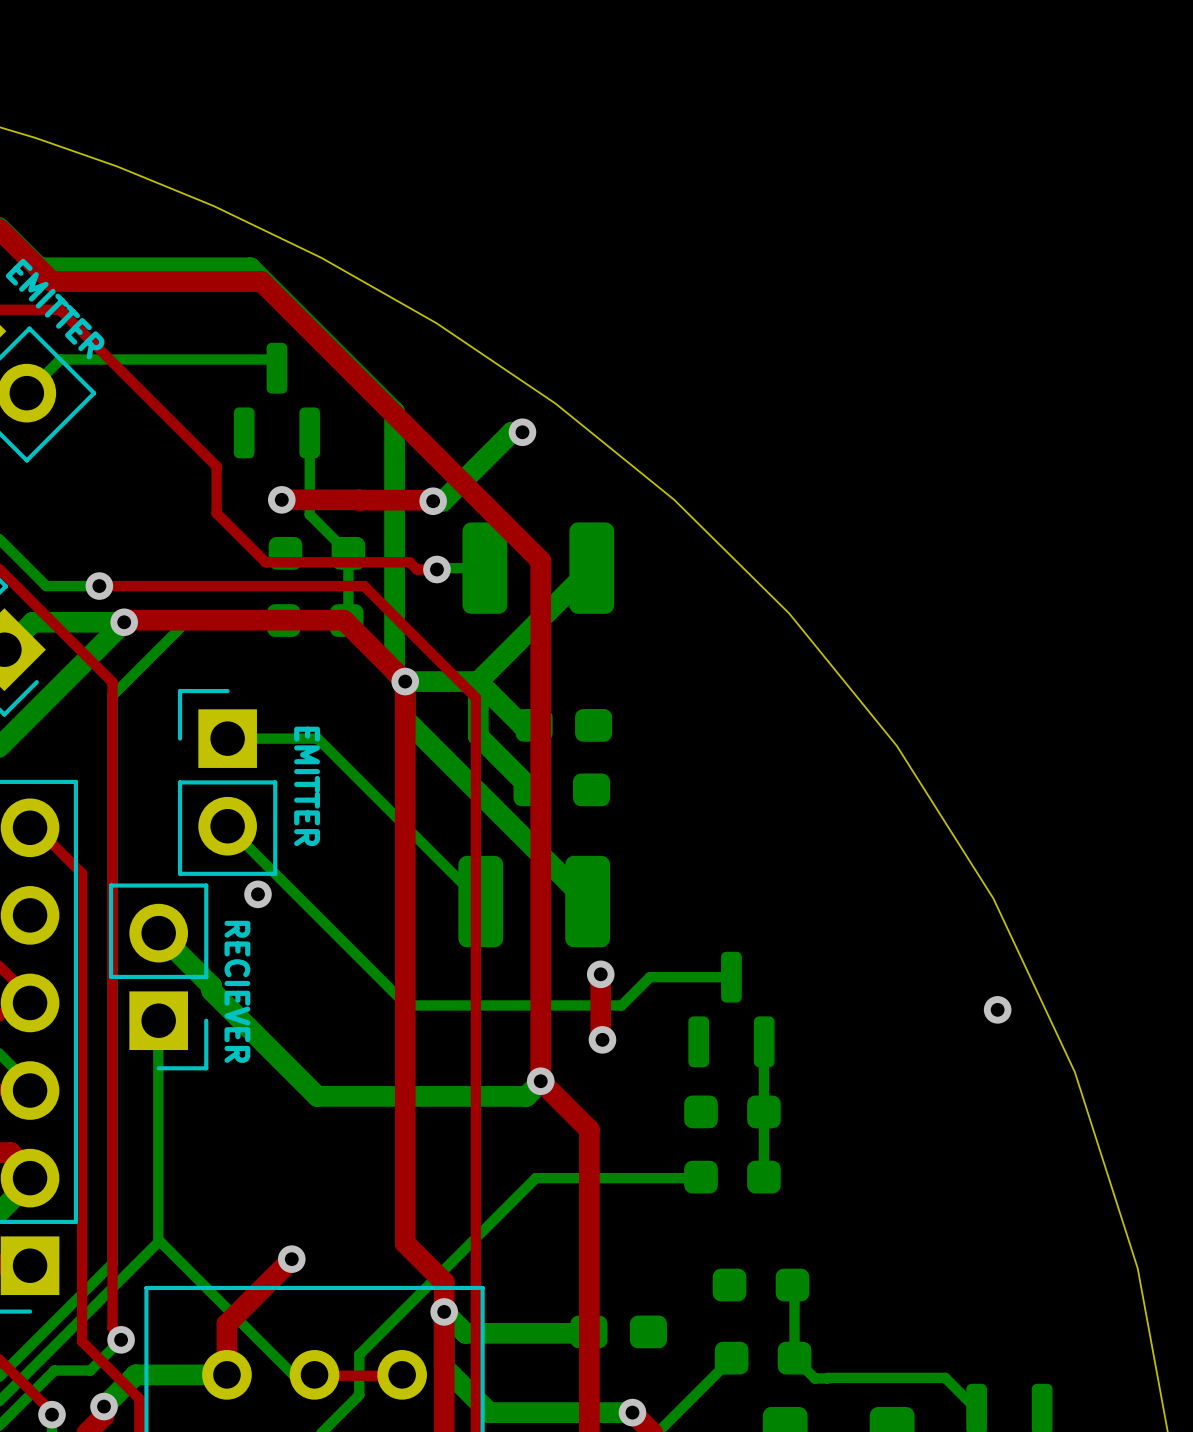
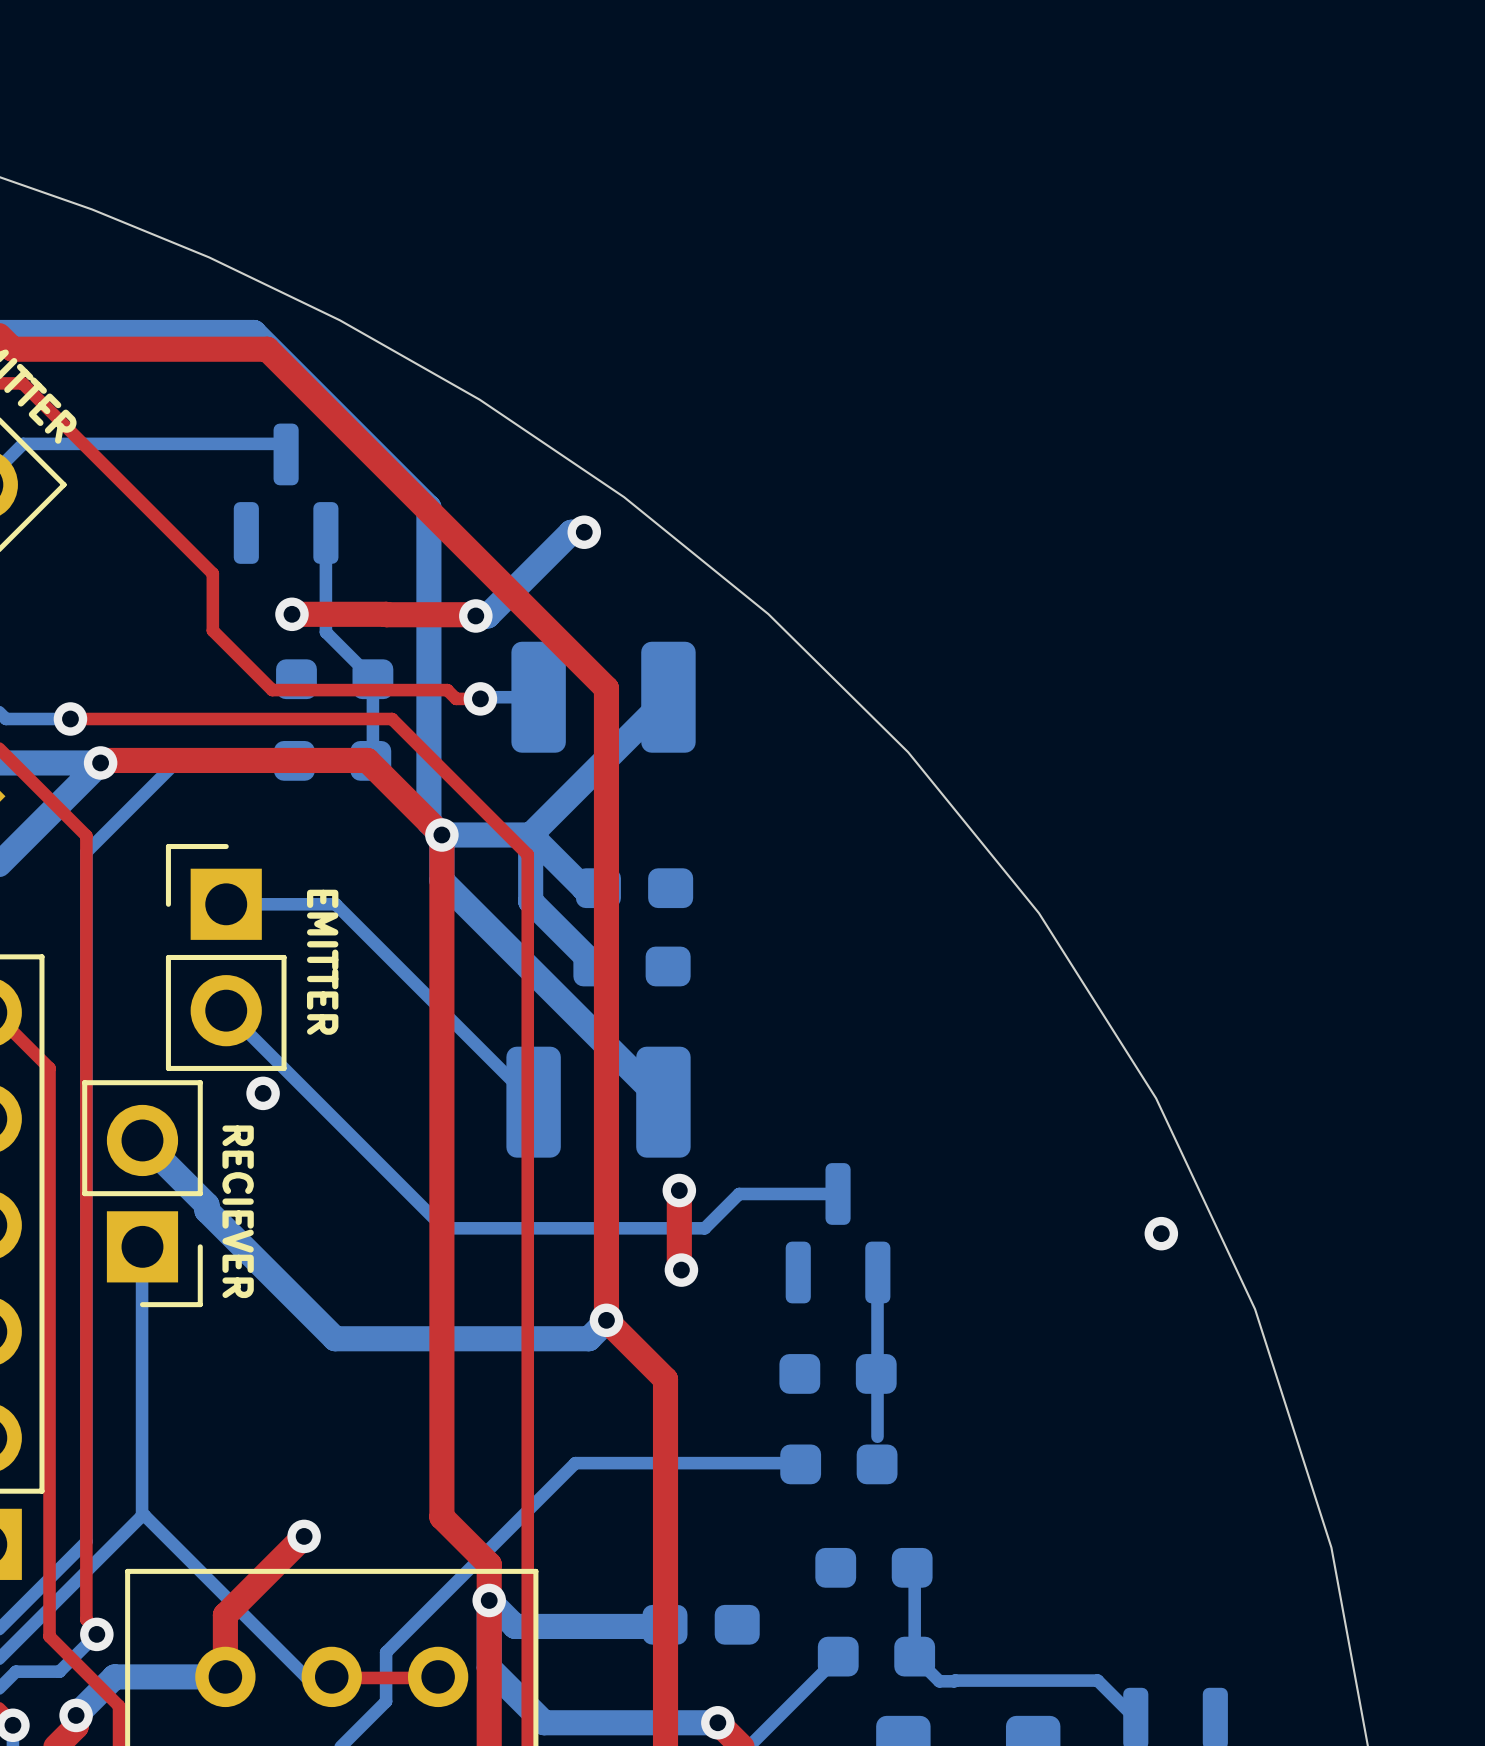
part position: (732, 1111) -> (838, 1373)
bottom track: (701, 1177) (535, 1178) (515, 1198) -> (801, 1463) (575, 1463)
part position: (732, 1177) -> (838, 1464)

